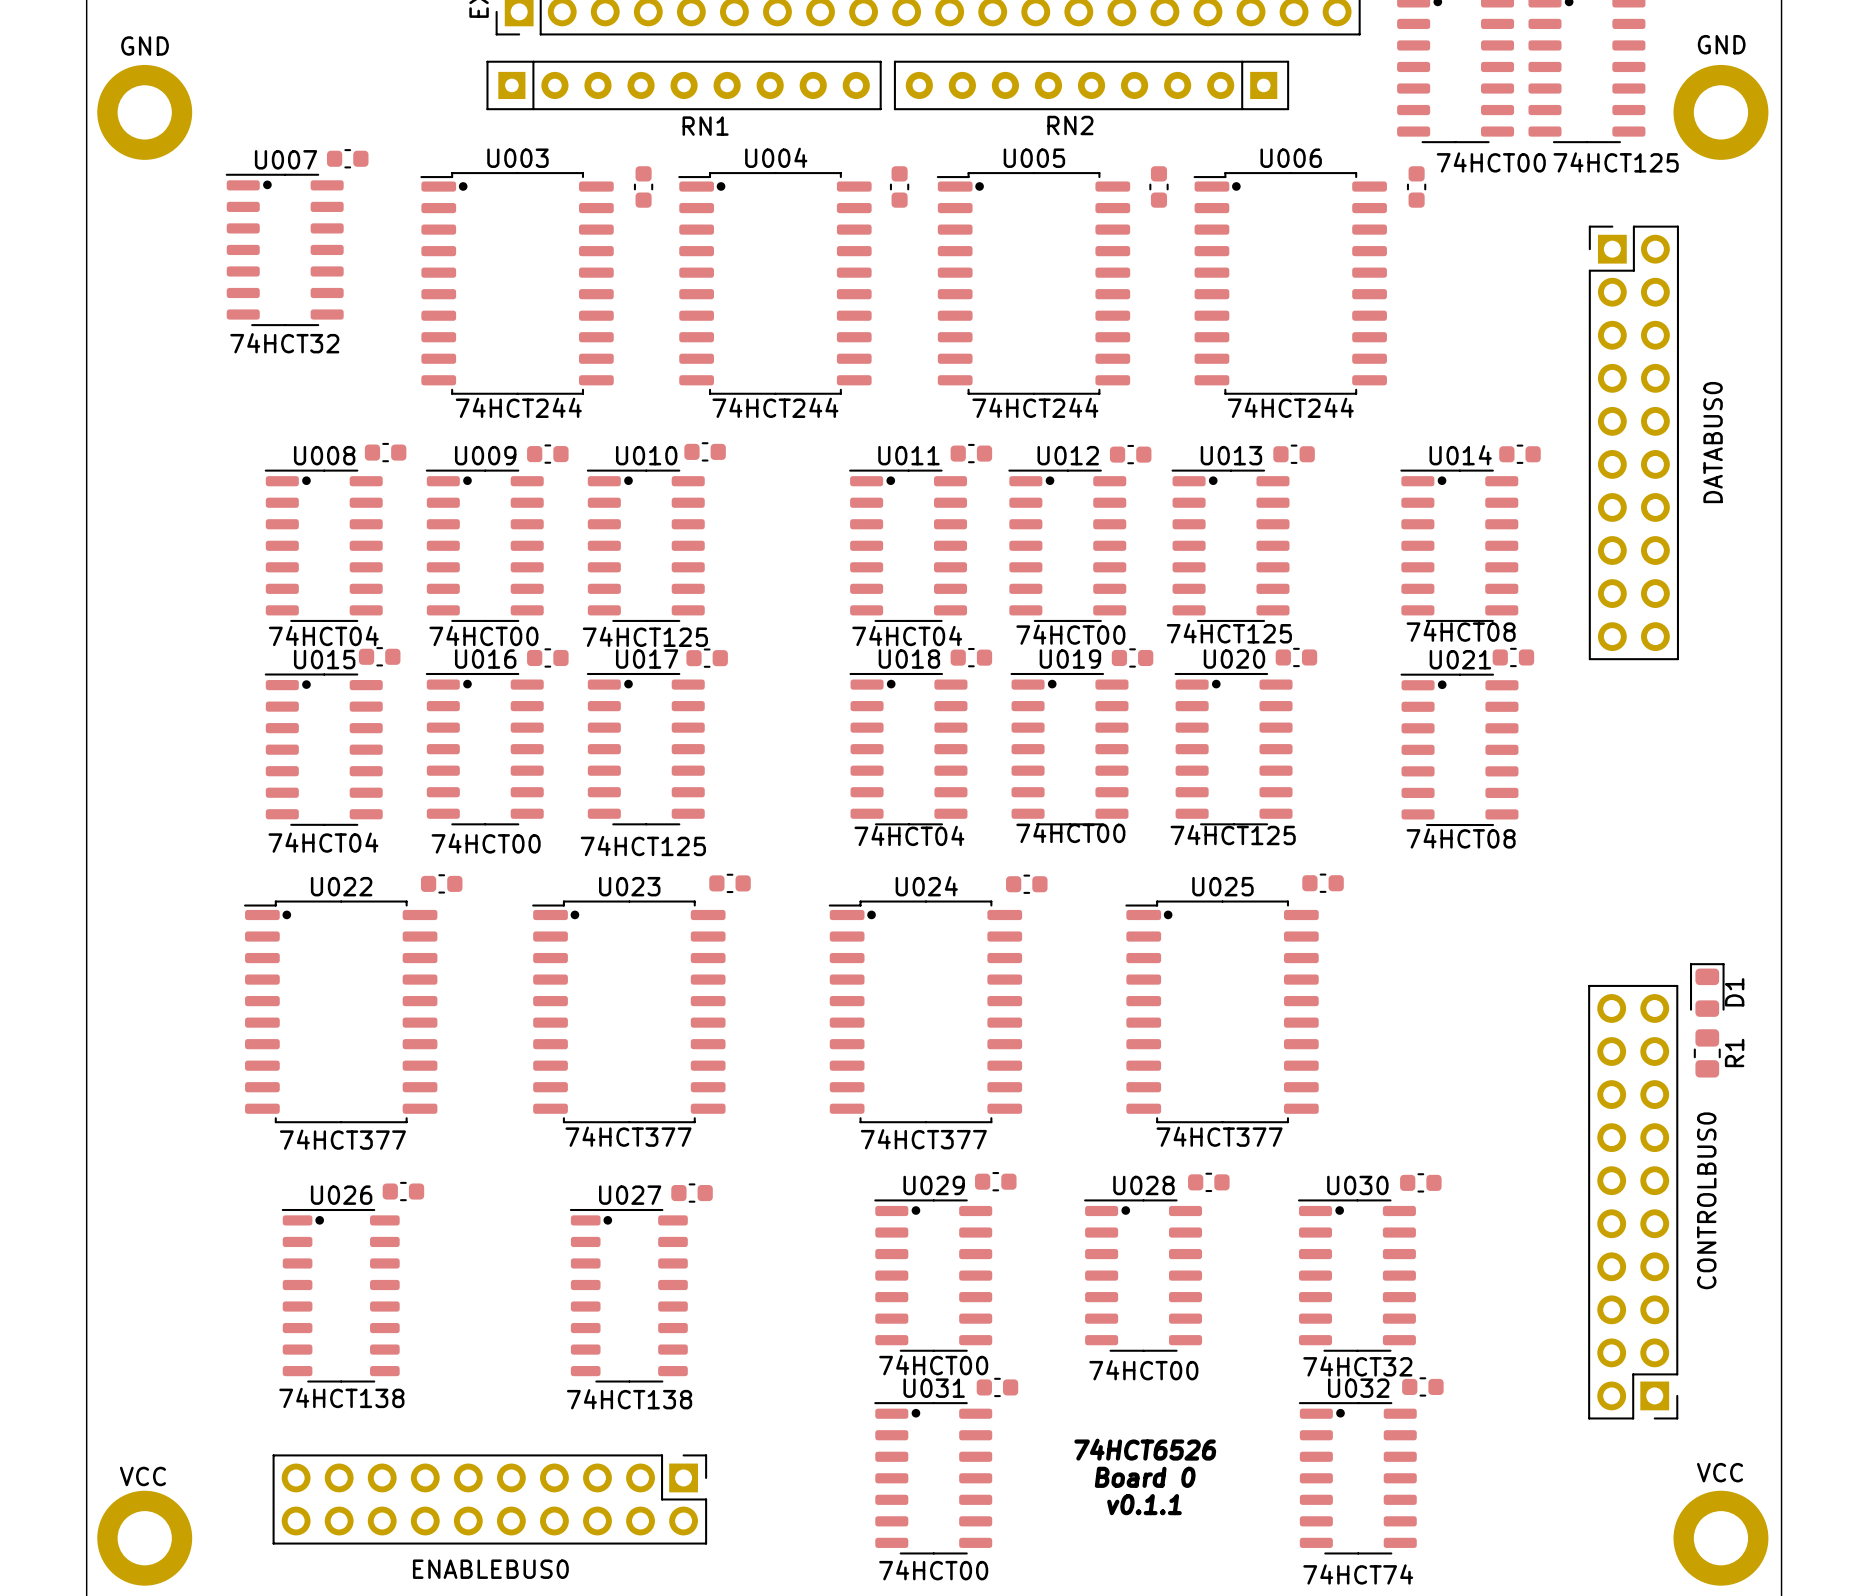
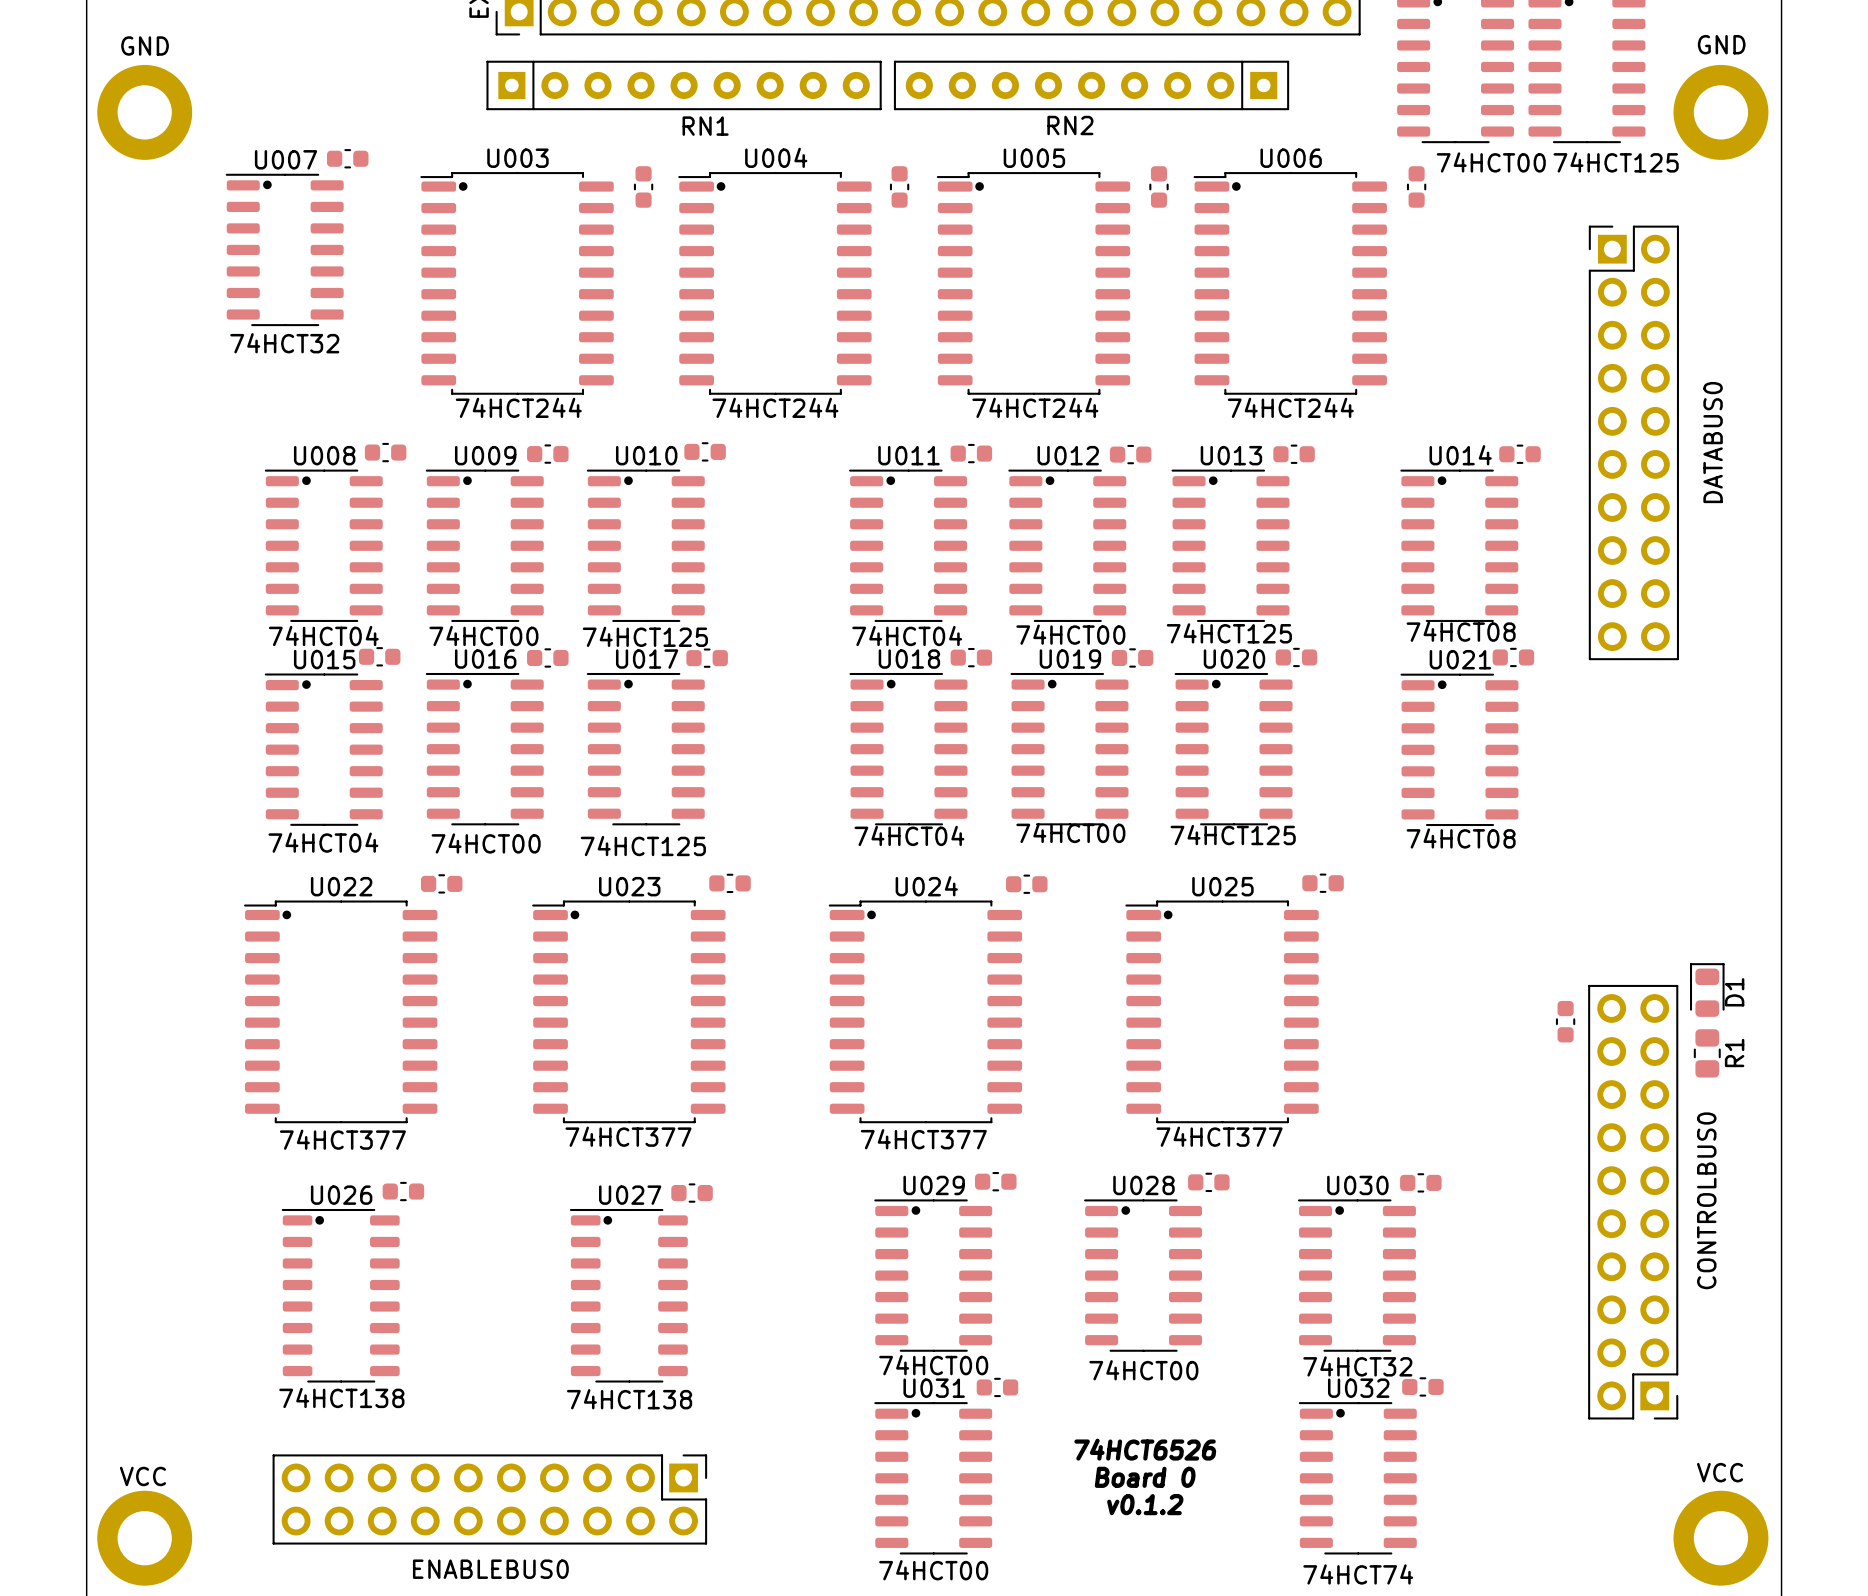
part: none -> (1565, 1021)
text: v0.1.1 (1144, 1504) -> v0.1.2 (1145, 1504)

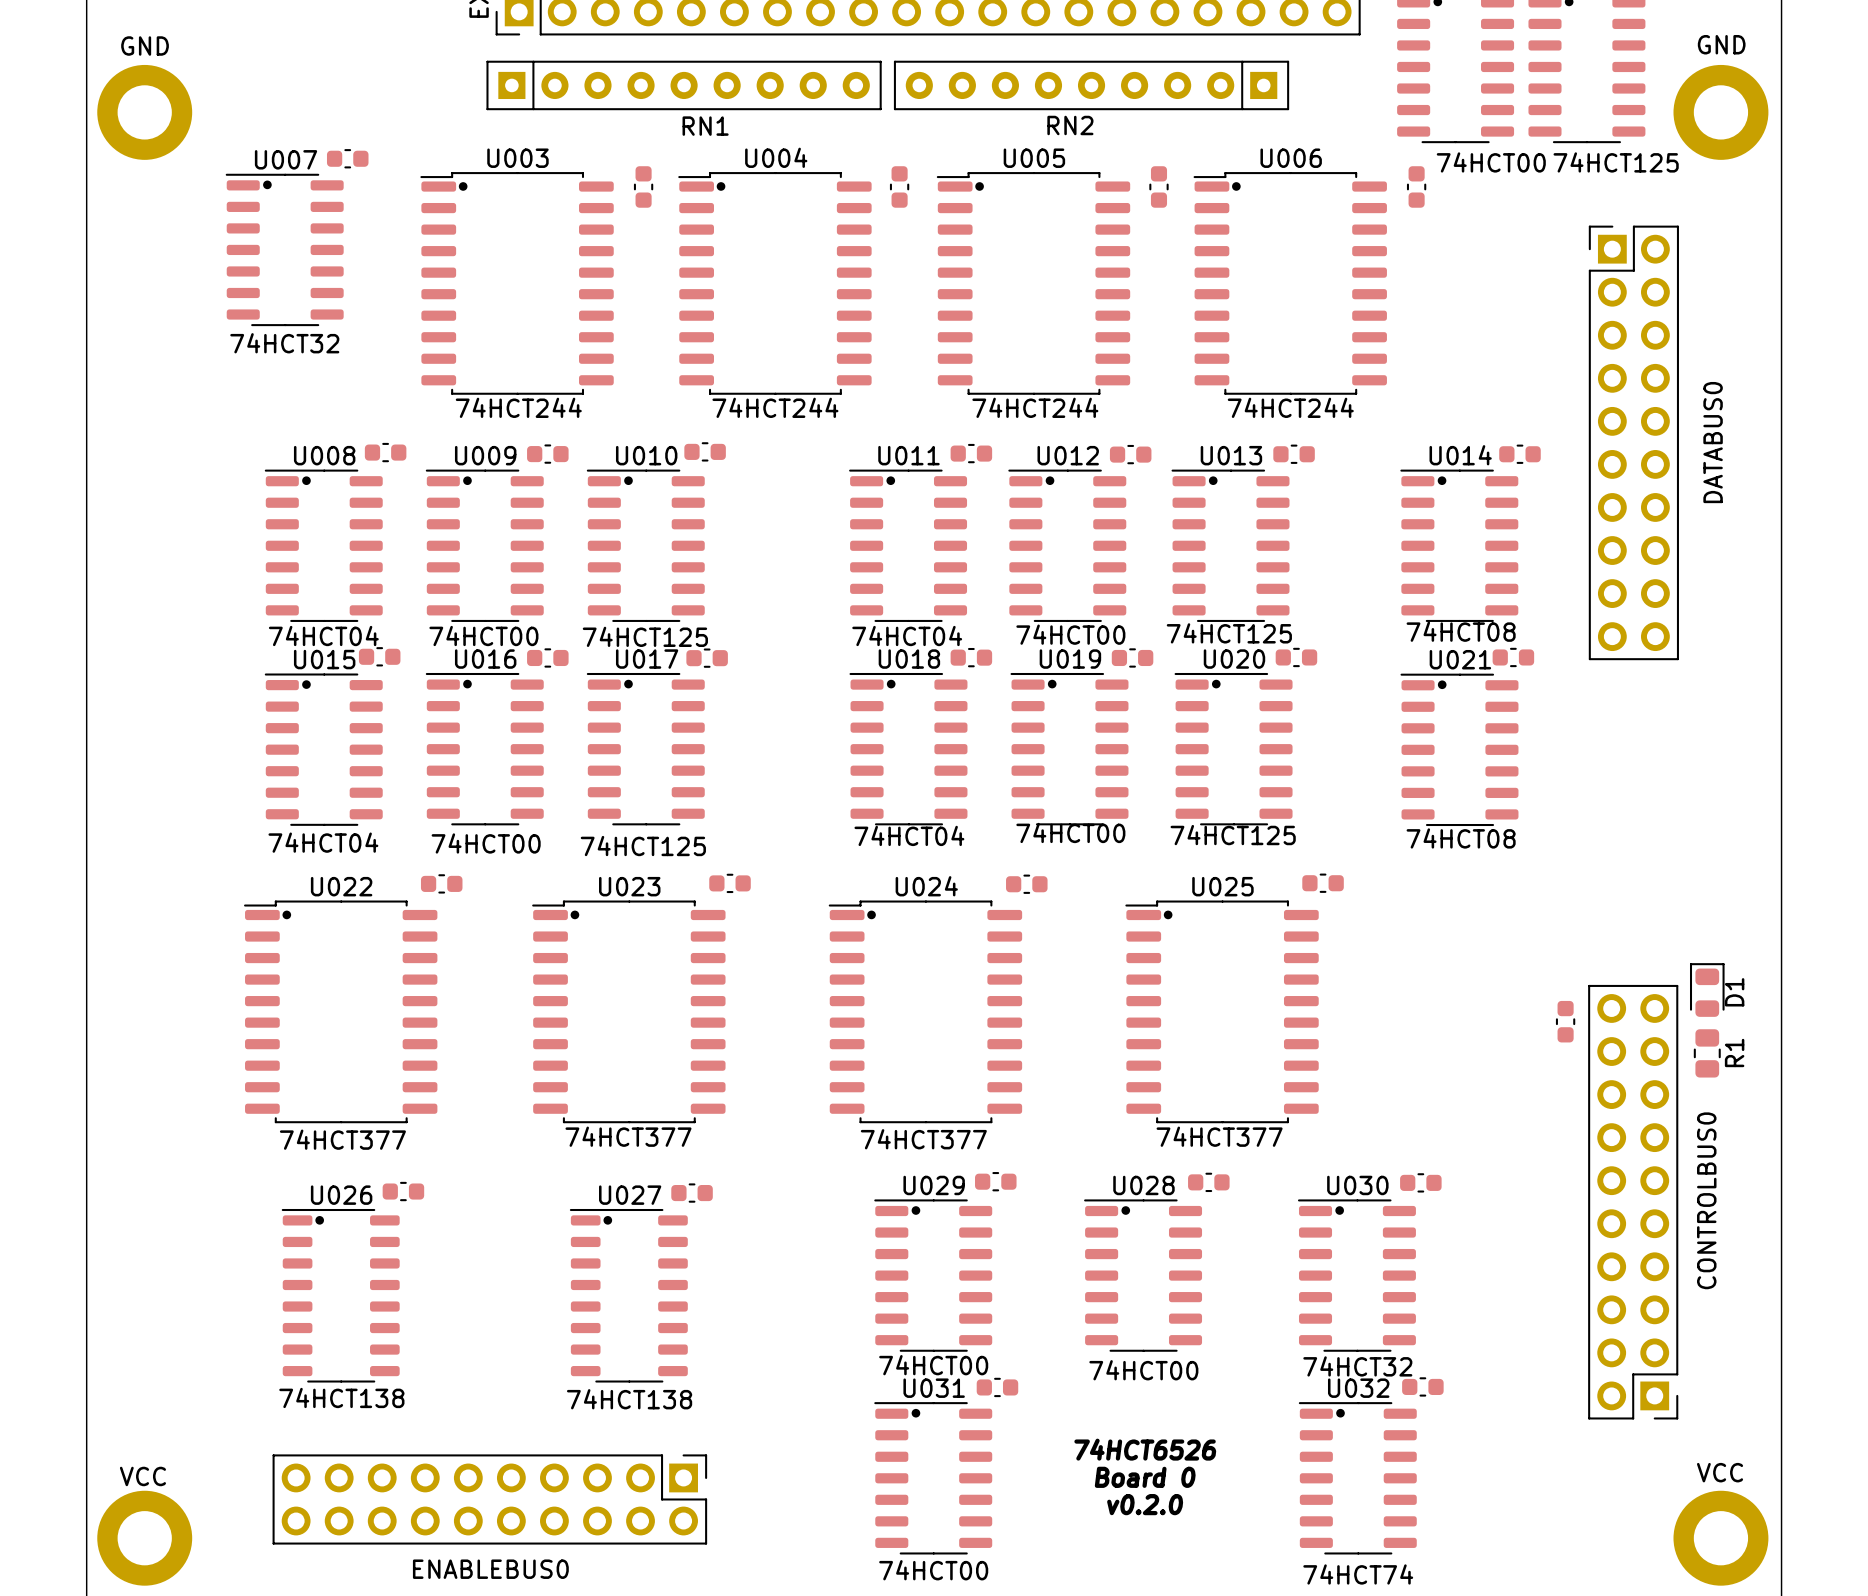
text: v0.1.2 (1145, 1504) -> v0.2.0 (1145, 1504)

